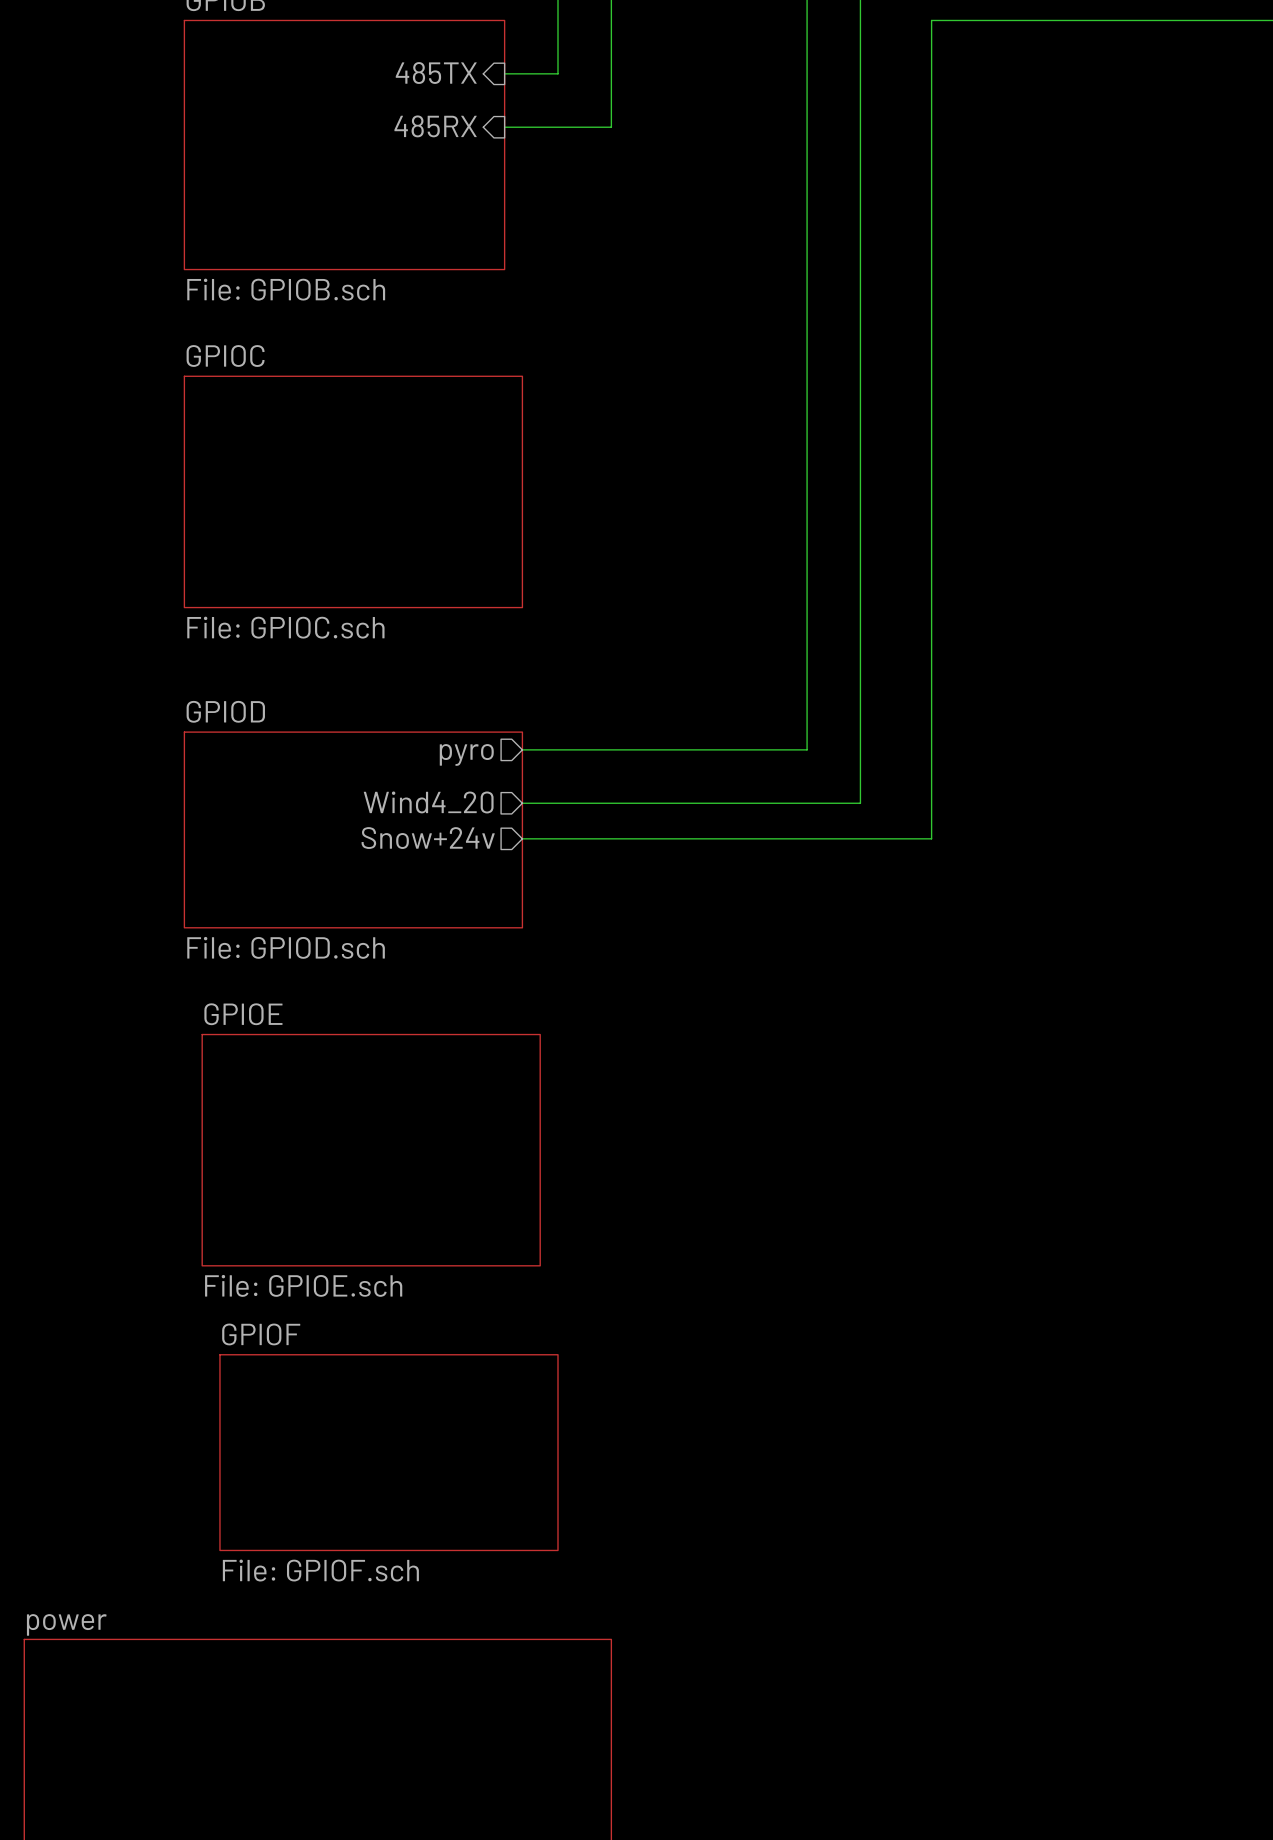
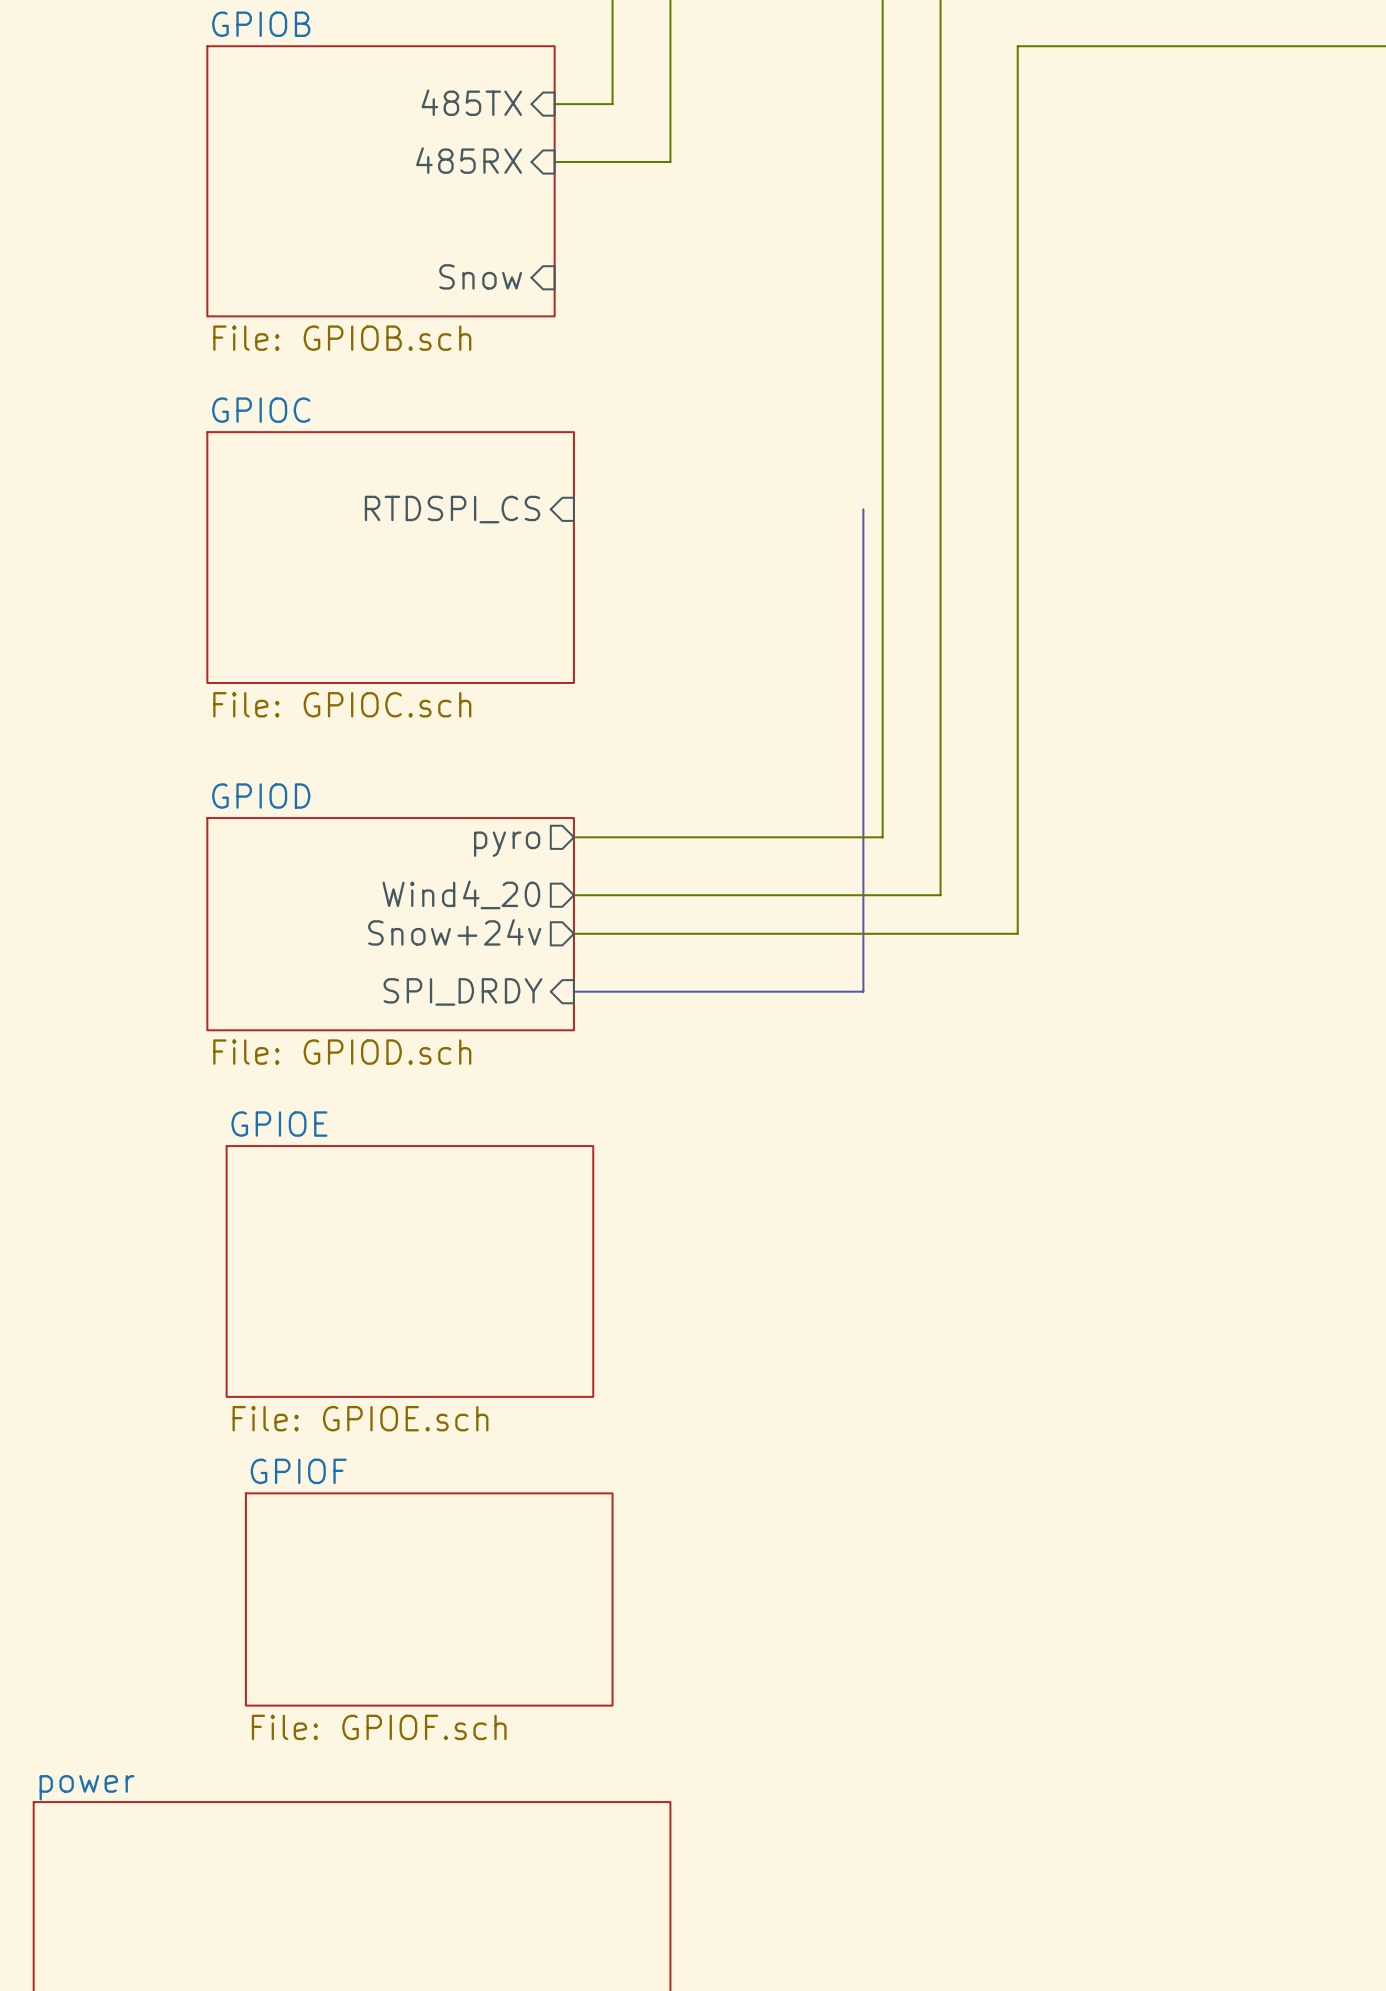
sheet pin: none -> Snow (480, 276)
sheet pin: none -> RTDSPI_CS (452, 509)
bus: none -> (863, 509) (863, 991) (573, 991)
sheet pin: none -> SPI_DRDY (462, 991)

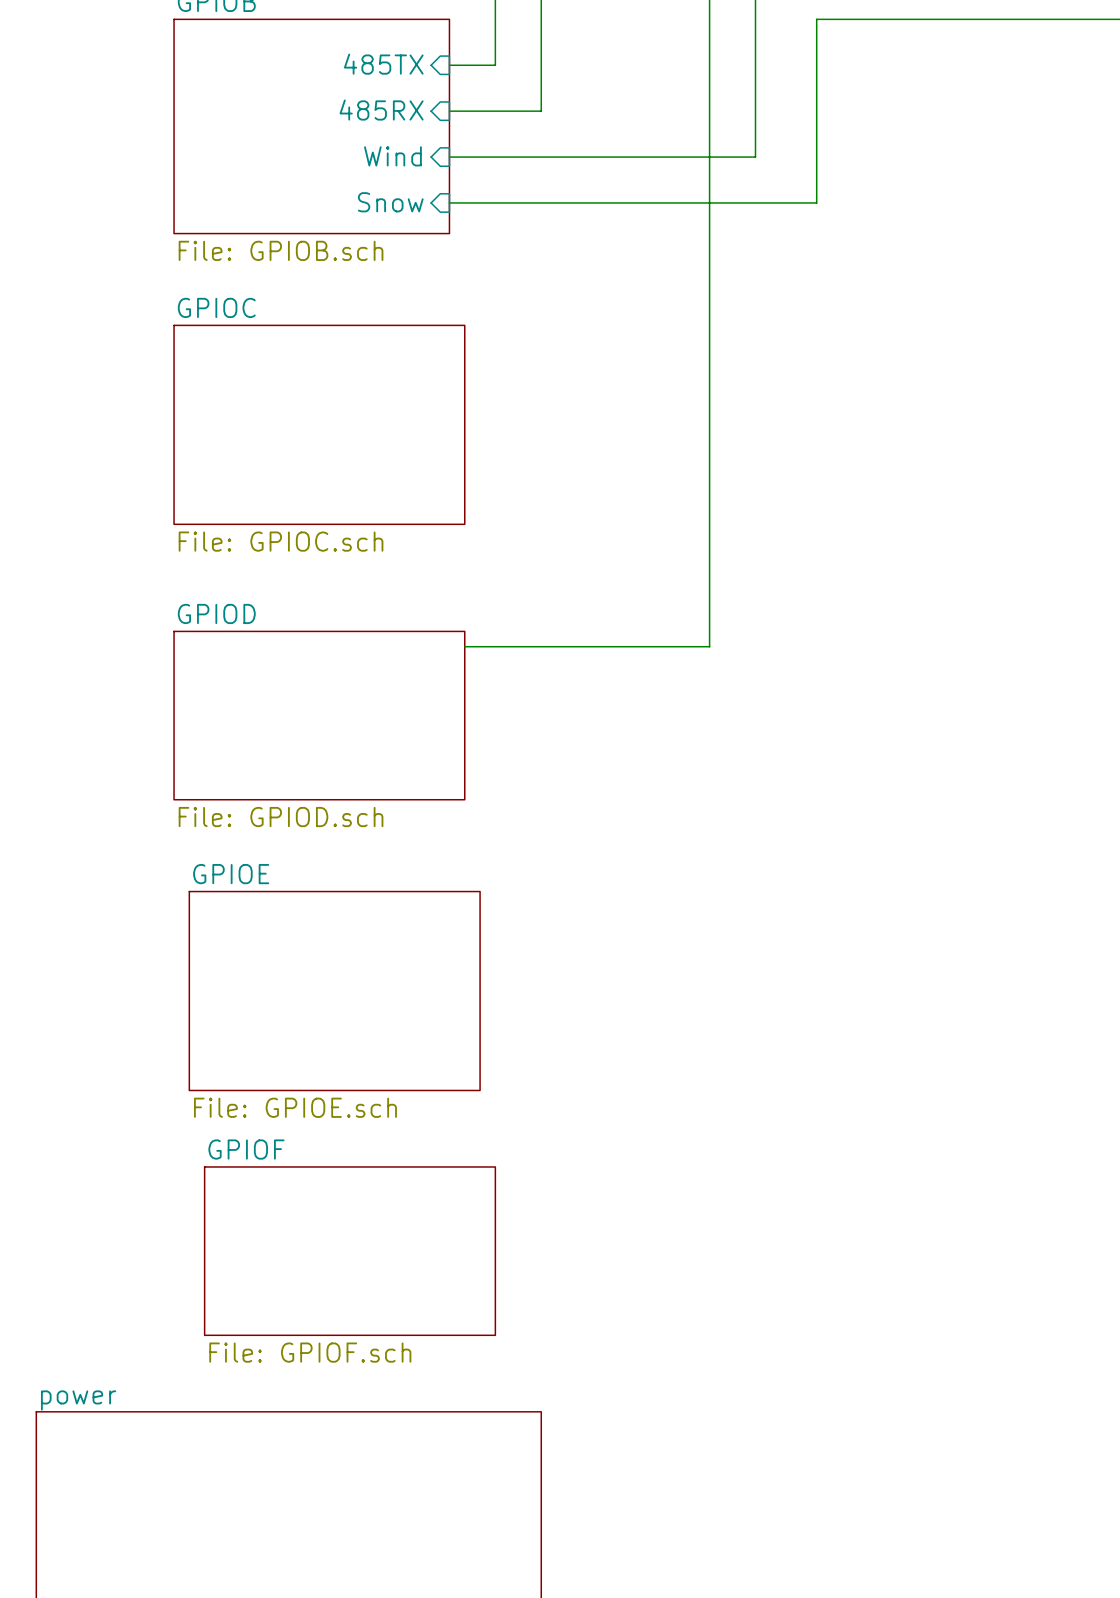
sheet pin: none -> Wind (392, 156)
wire: (940, 219) (940, 895) (573, 895) -> (755, 157) (449, 157)
wire: (1017, 277) (1017, 933) (573, 933) -> (816, 202) (449, 202)
sheet pin: RTDSPI_CS (452, 509) -> none
bus: (863, 509) (863, 991) (573, 991) -> none
sheet pin: pyro (507, 844) -> none
sheet pin: Wind4_20 (461, 894) -> none
sheet pin: Snow+24v (454, 932) -> none
sheet pin: SPI_DRDY (462, 991) -> none

